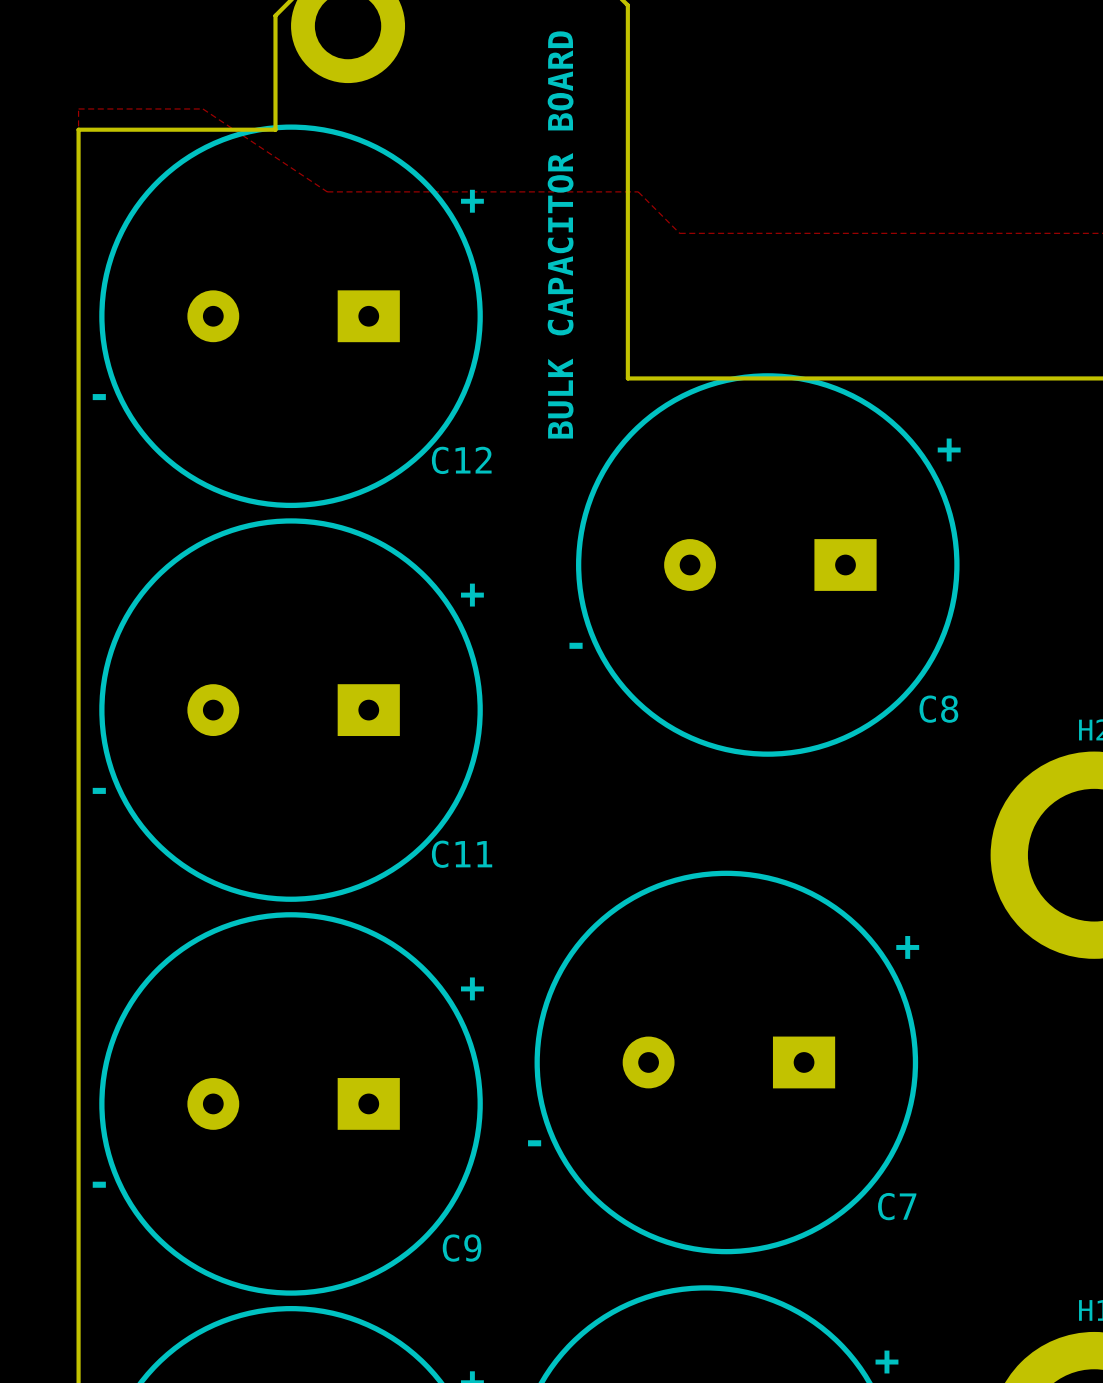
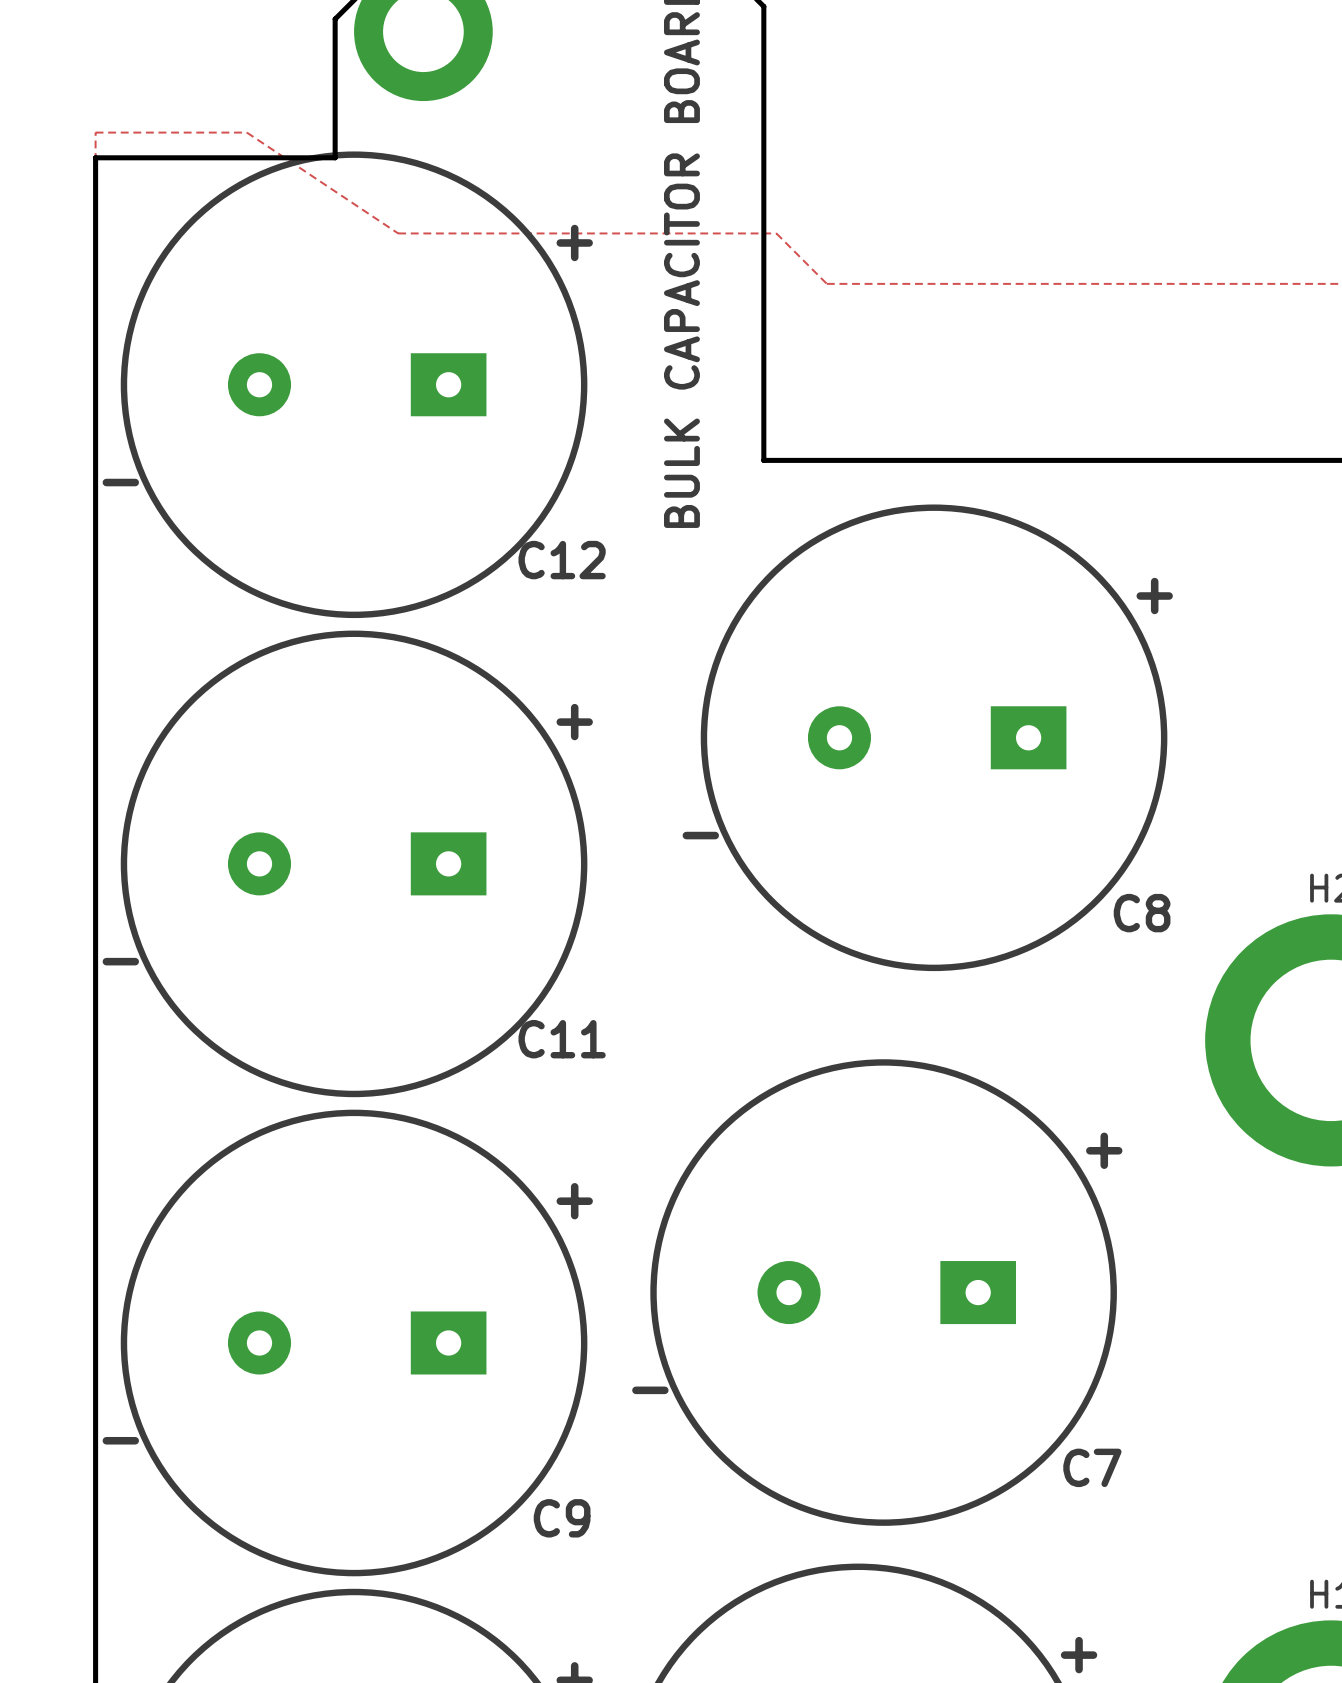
C8 position: (767, 565) -> (934, 737)

